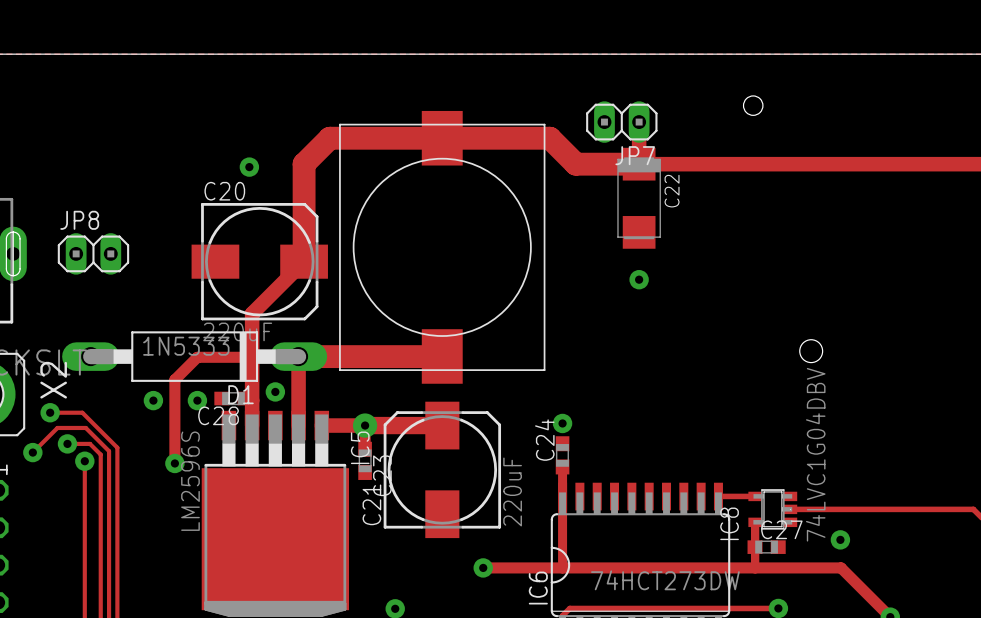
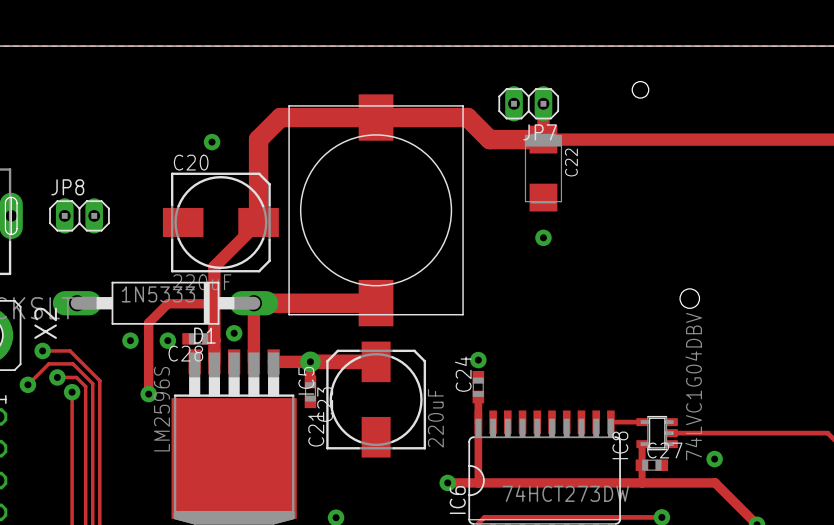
track: (483, 567) (526, 567) -> none
via position: (483, 567) -> (447, 482)

